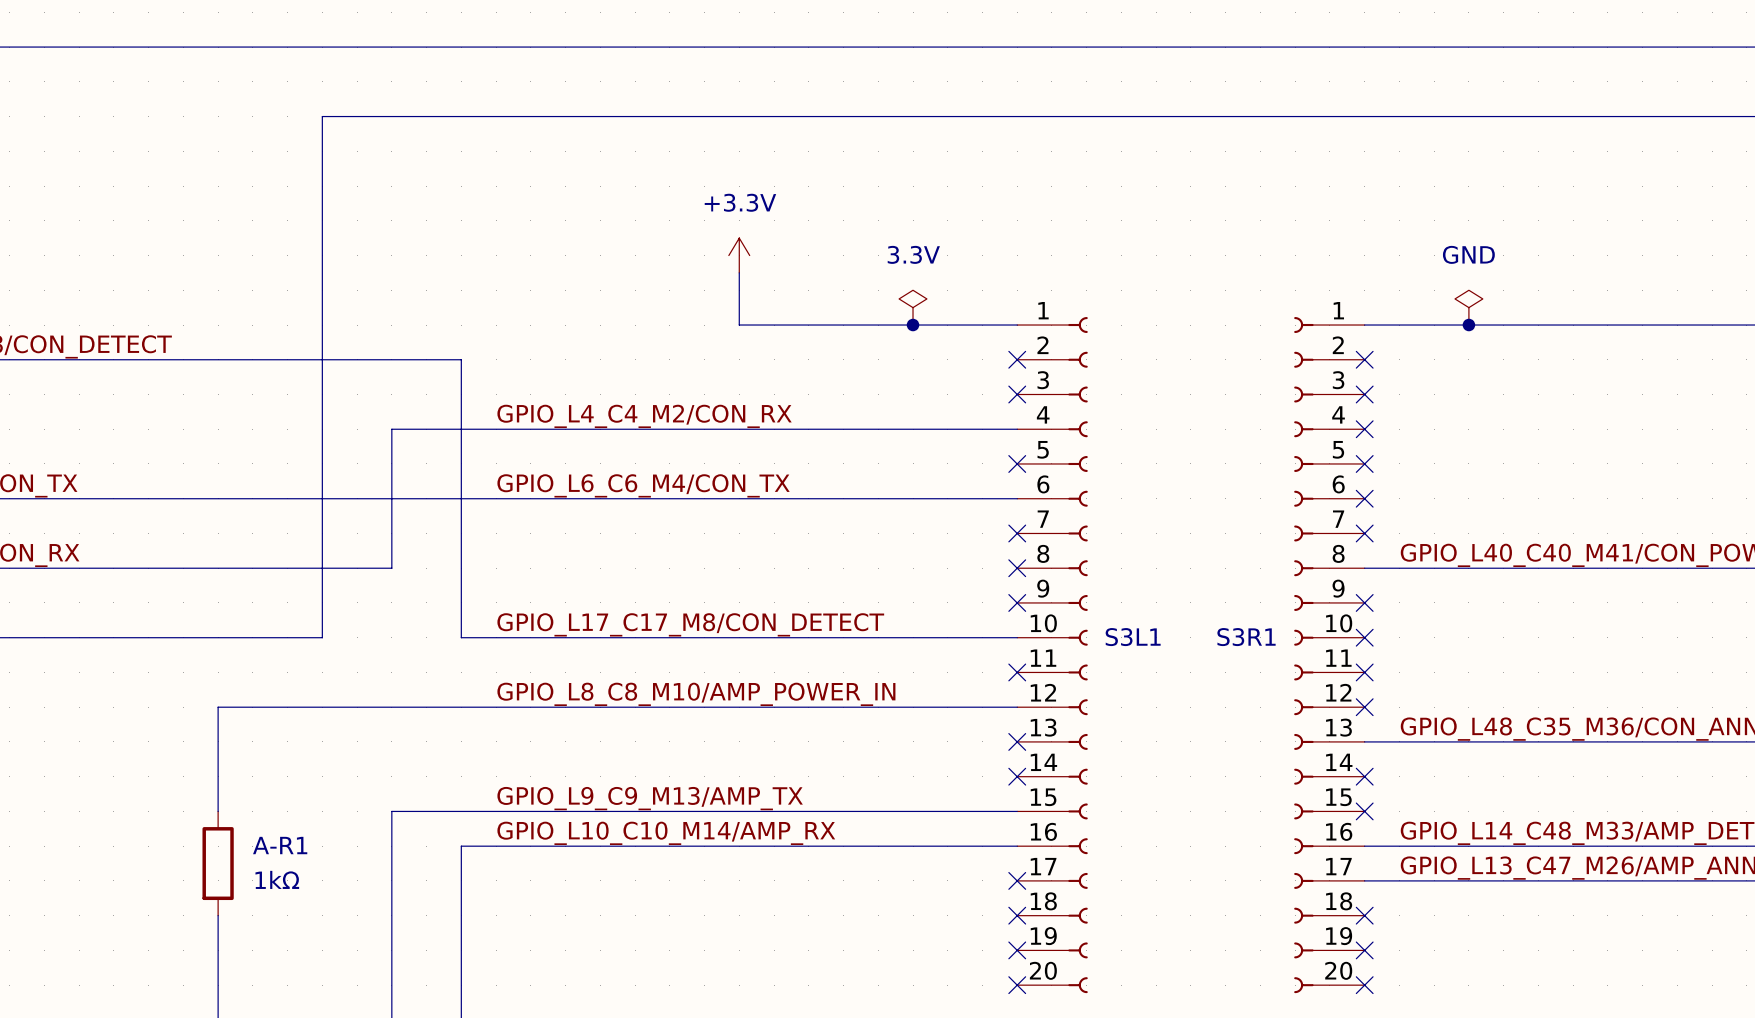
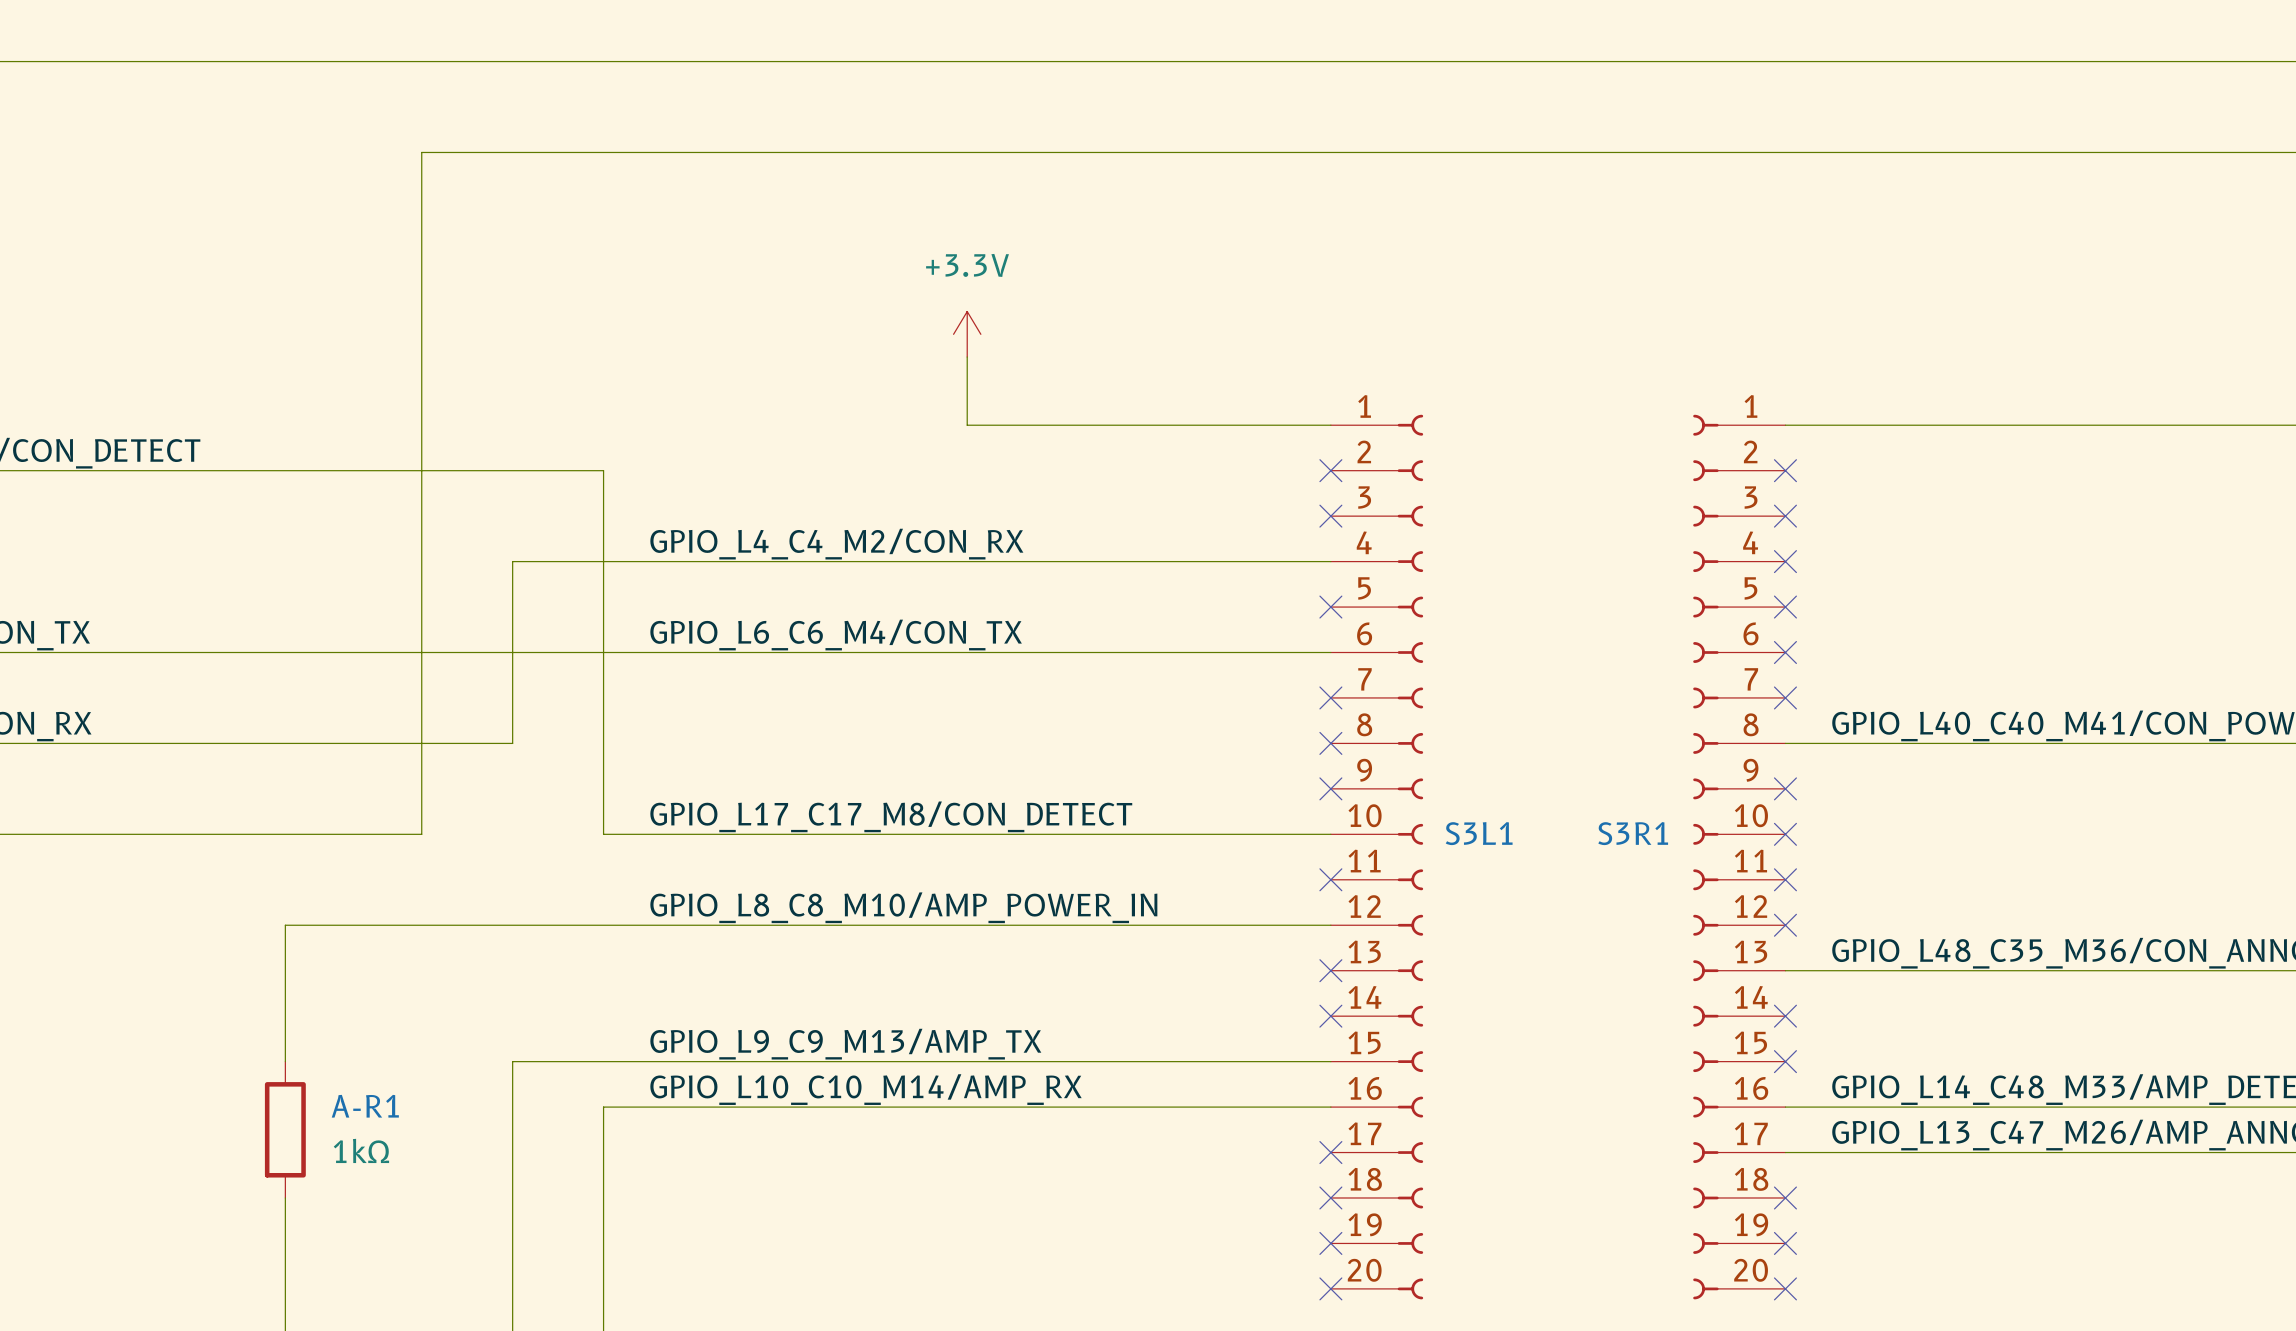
power symbol: 3.3V (913, 307) -> none
power symbol: GND (1468, 307) -> none
junction: (913, 325) -> none
junction: (1468, 325) -> none

